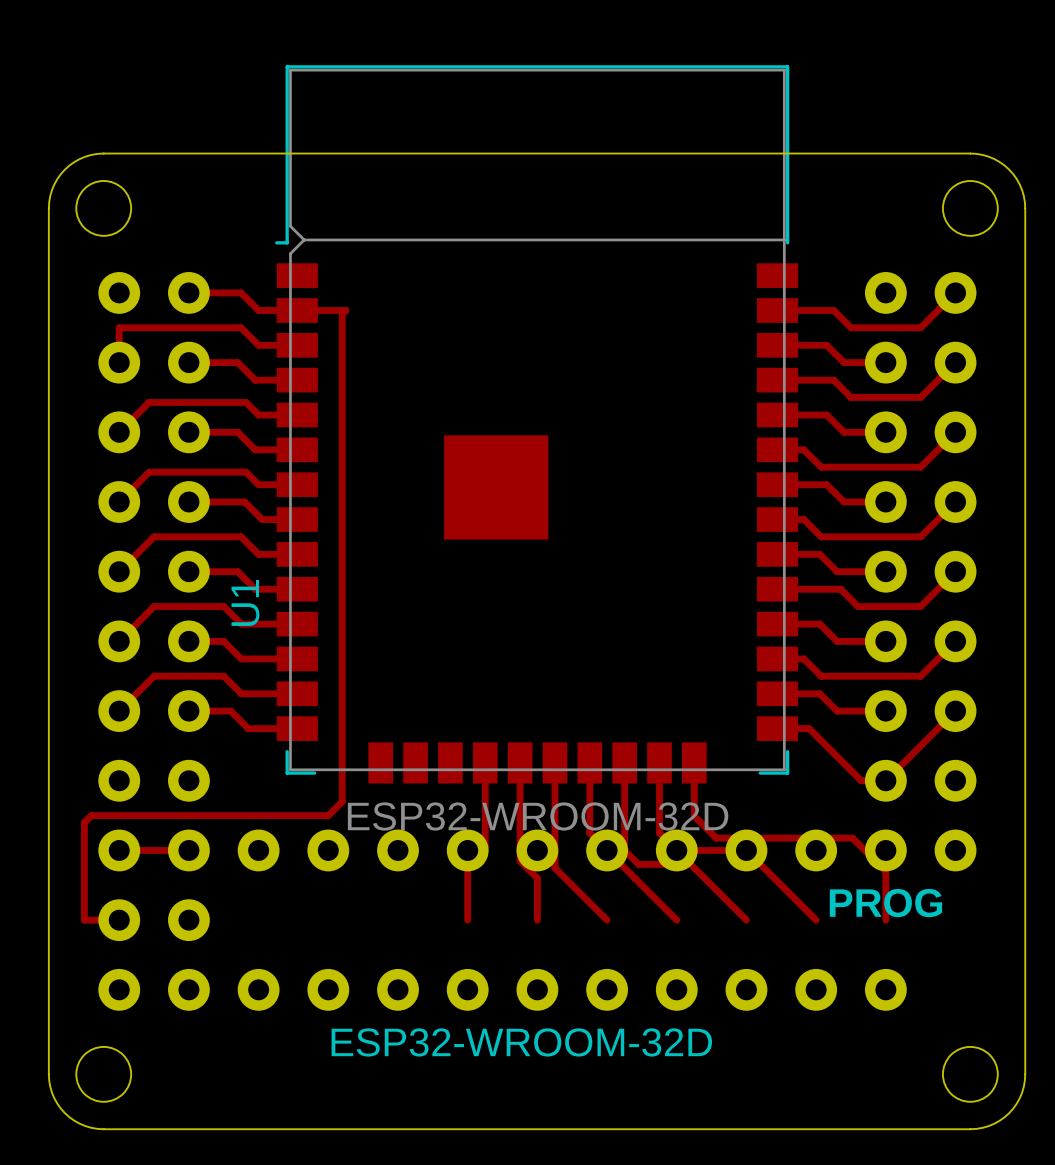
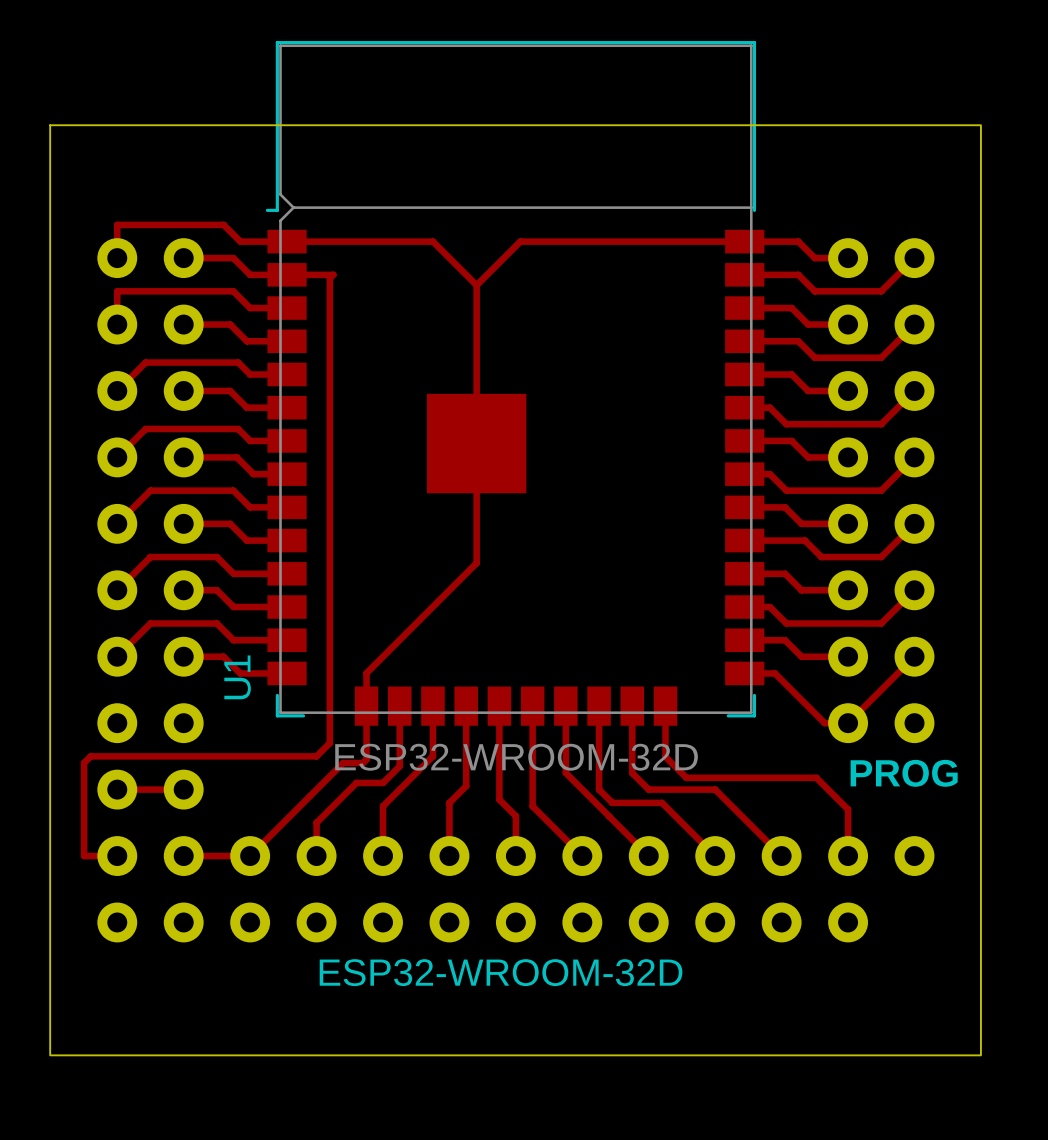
U1 footprint: [48, 65, 1026, 1130] -> [49, 41, 982, 1057]
track: none -> (117, 258) (117, 224) (223, 224) (240, 241) (432, 241) (476, 285)
track: none -> (848, 258) (814, 258) (798, 241) (520, 241) (476, 285)
track: none -> (476, 285) (476, 563) (366, 673) (366, 759) (363, 763) (343, 763) (250, 856) (183, 856)
U1 name position: U1 (245, 602) -> U1 (237, 677)
track: none -> (399, 706) (399, 766) (383, 782) (356, 782) (316, 822) (316, 856)
track: none -> (432, 706) (432, 756) (383, 806) (383, 856)

